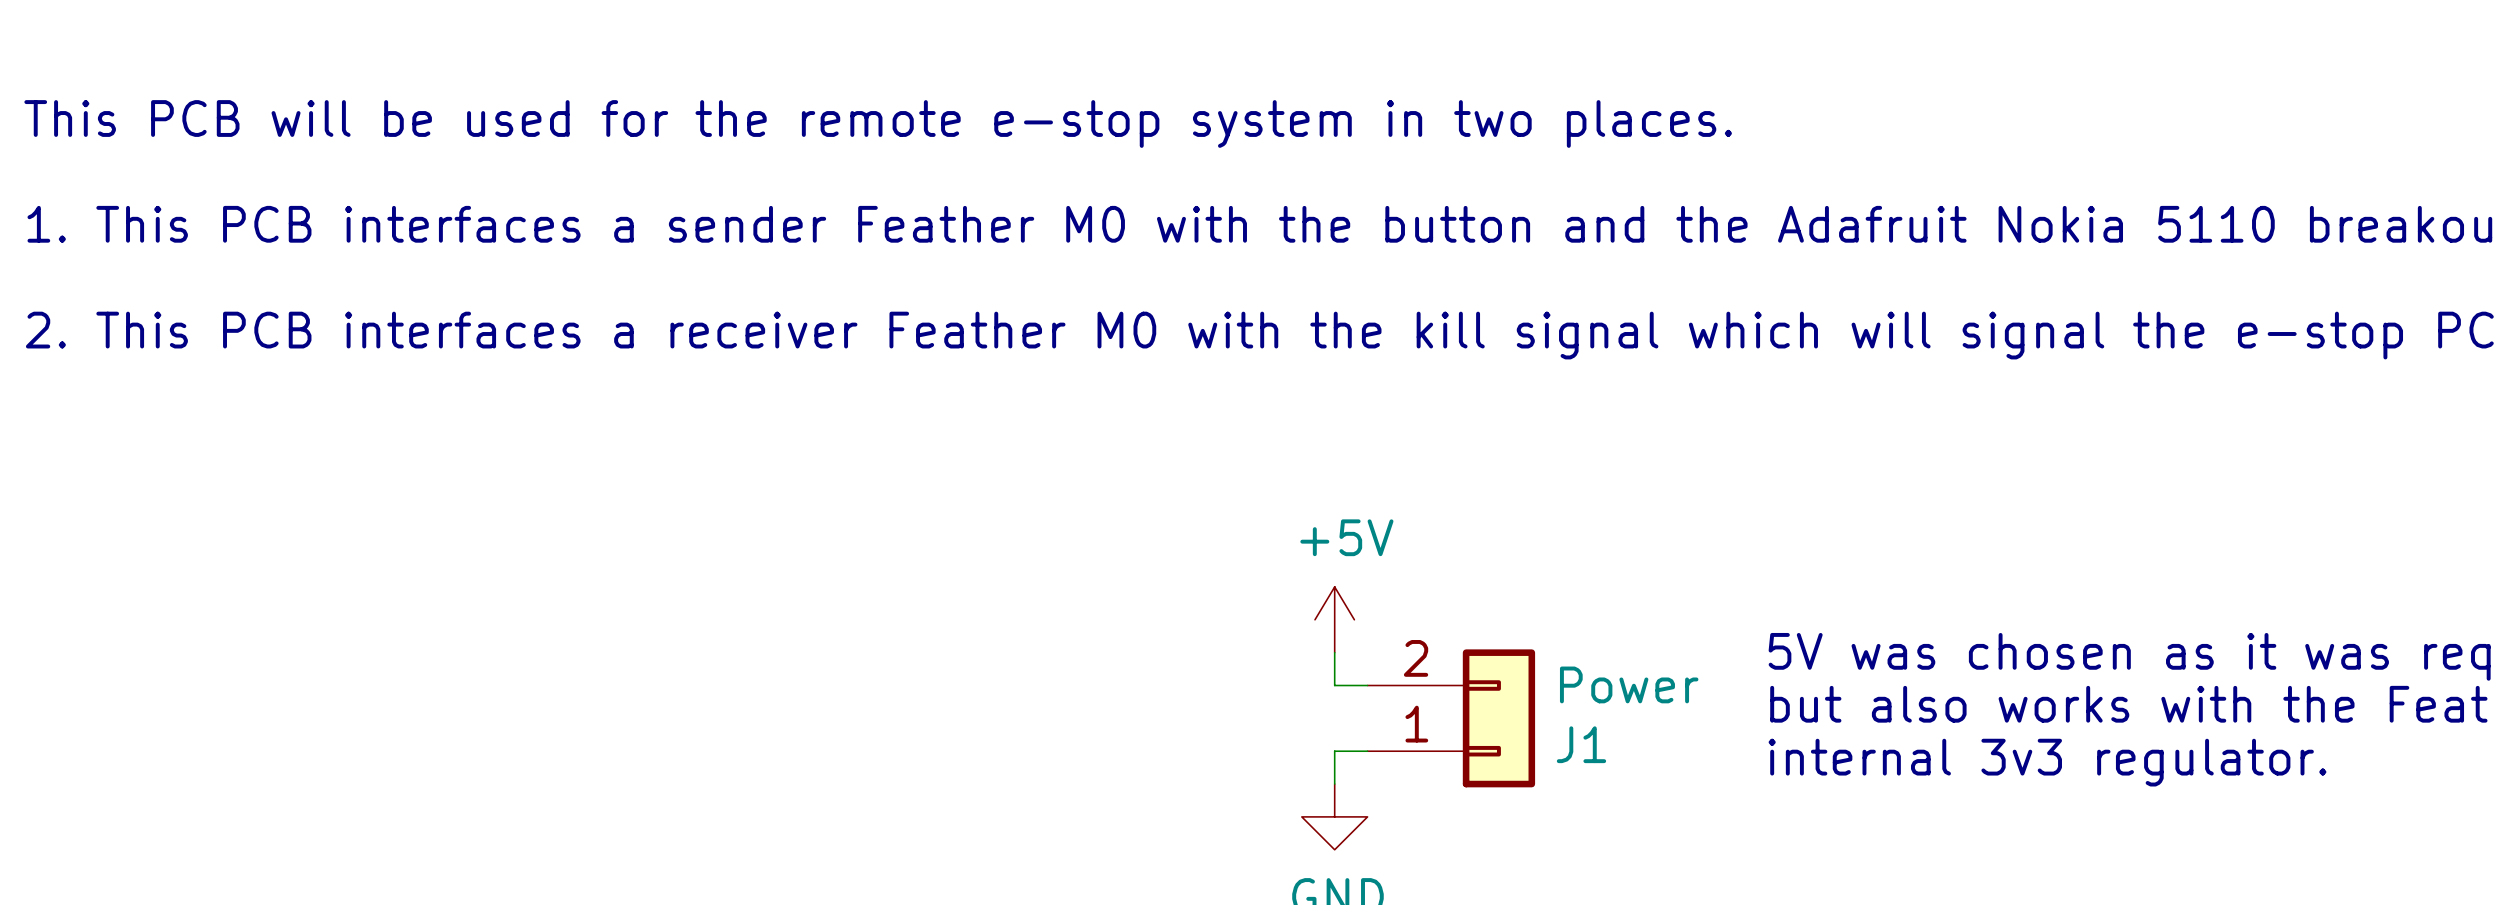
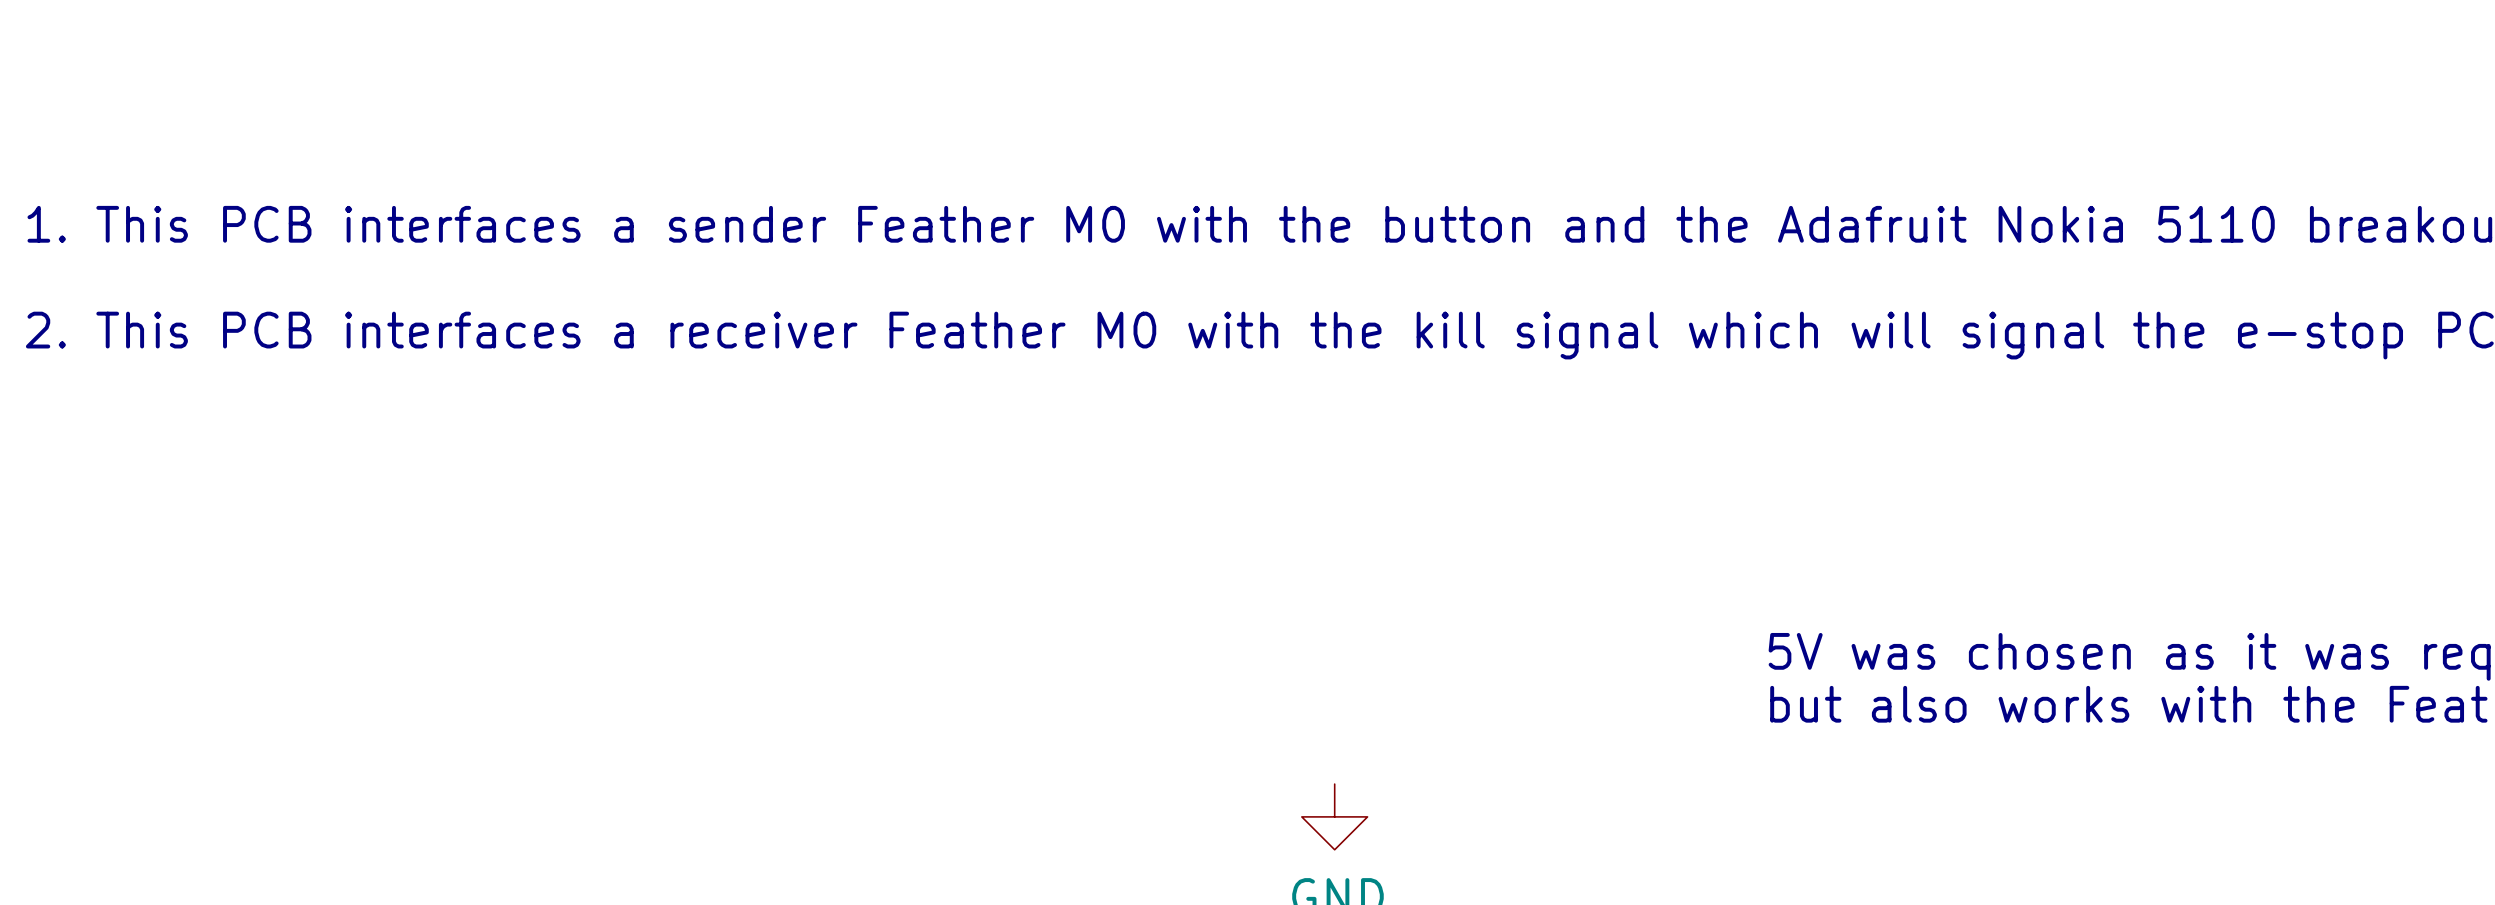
text: This PCB will be used for the remote e-stop system in two places. (878, 123) -> none
power symbol: +5V (1334, 619) -> none
wire: (1334, 652) (1334, 685) (1367, 685) -> none
J1: Power (1451, 718) -> none
wire: (1367, 751) (1334, 751) (1334, 784) -> none
text: internal 3v3 regulator. (2047, 762) -> none

